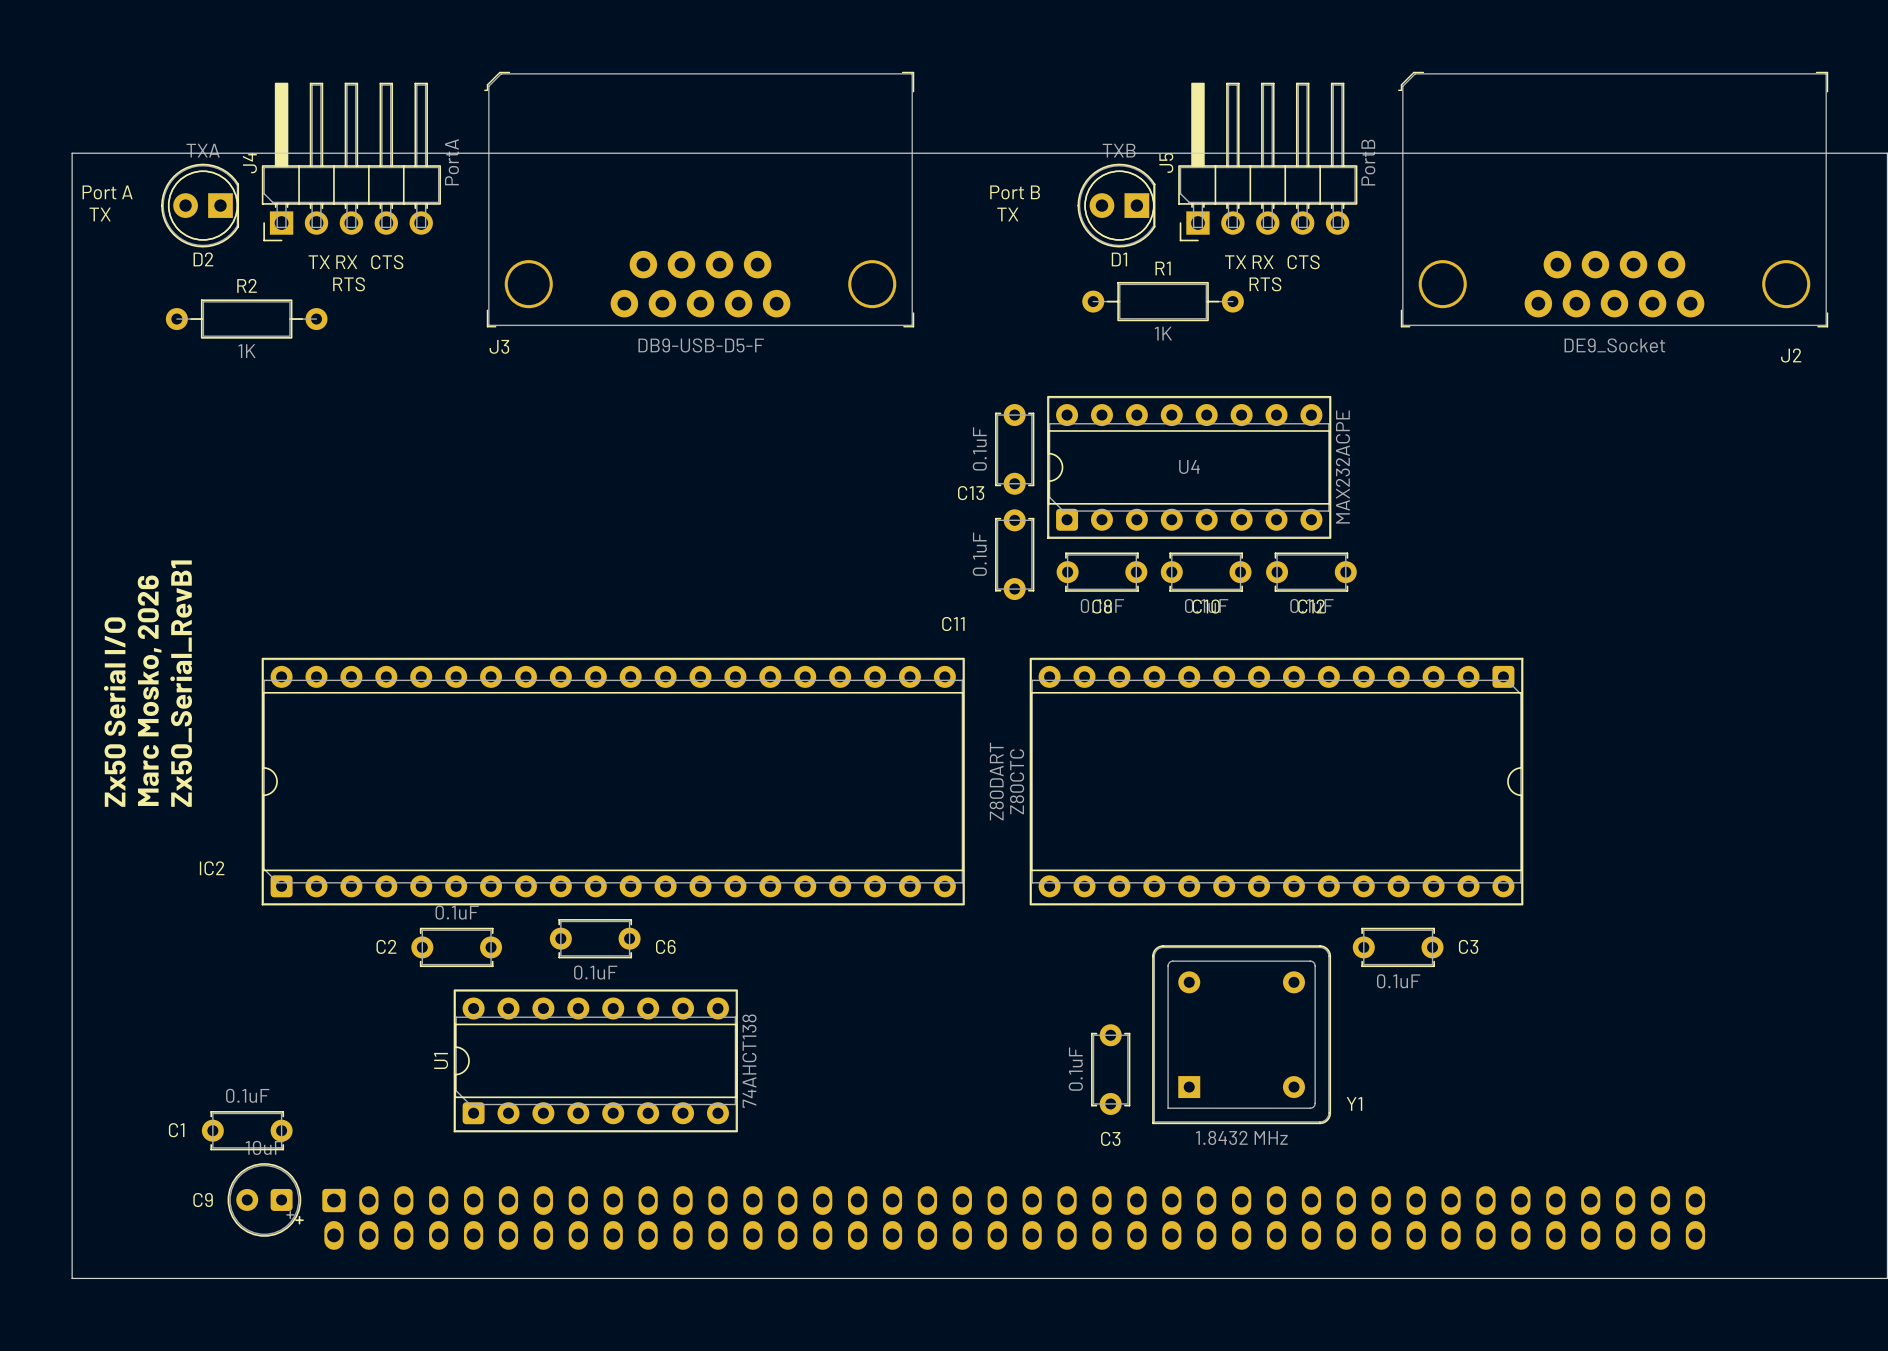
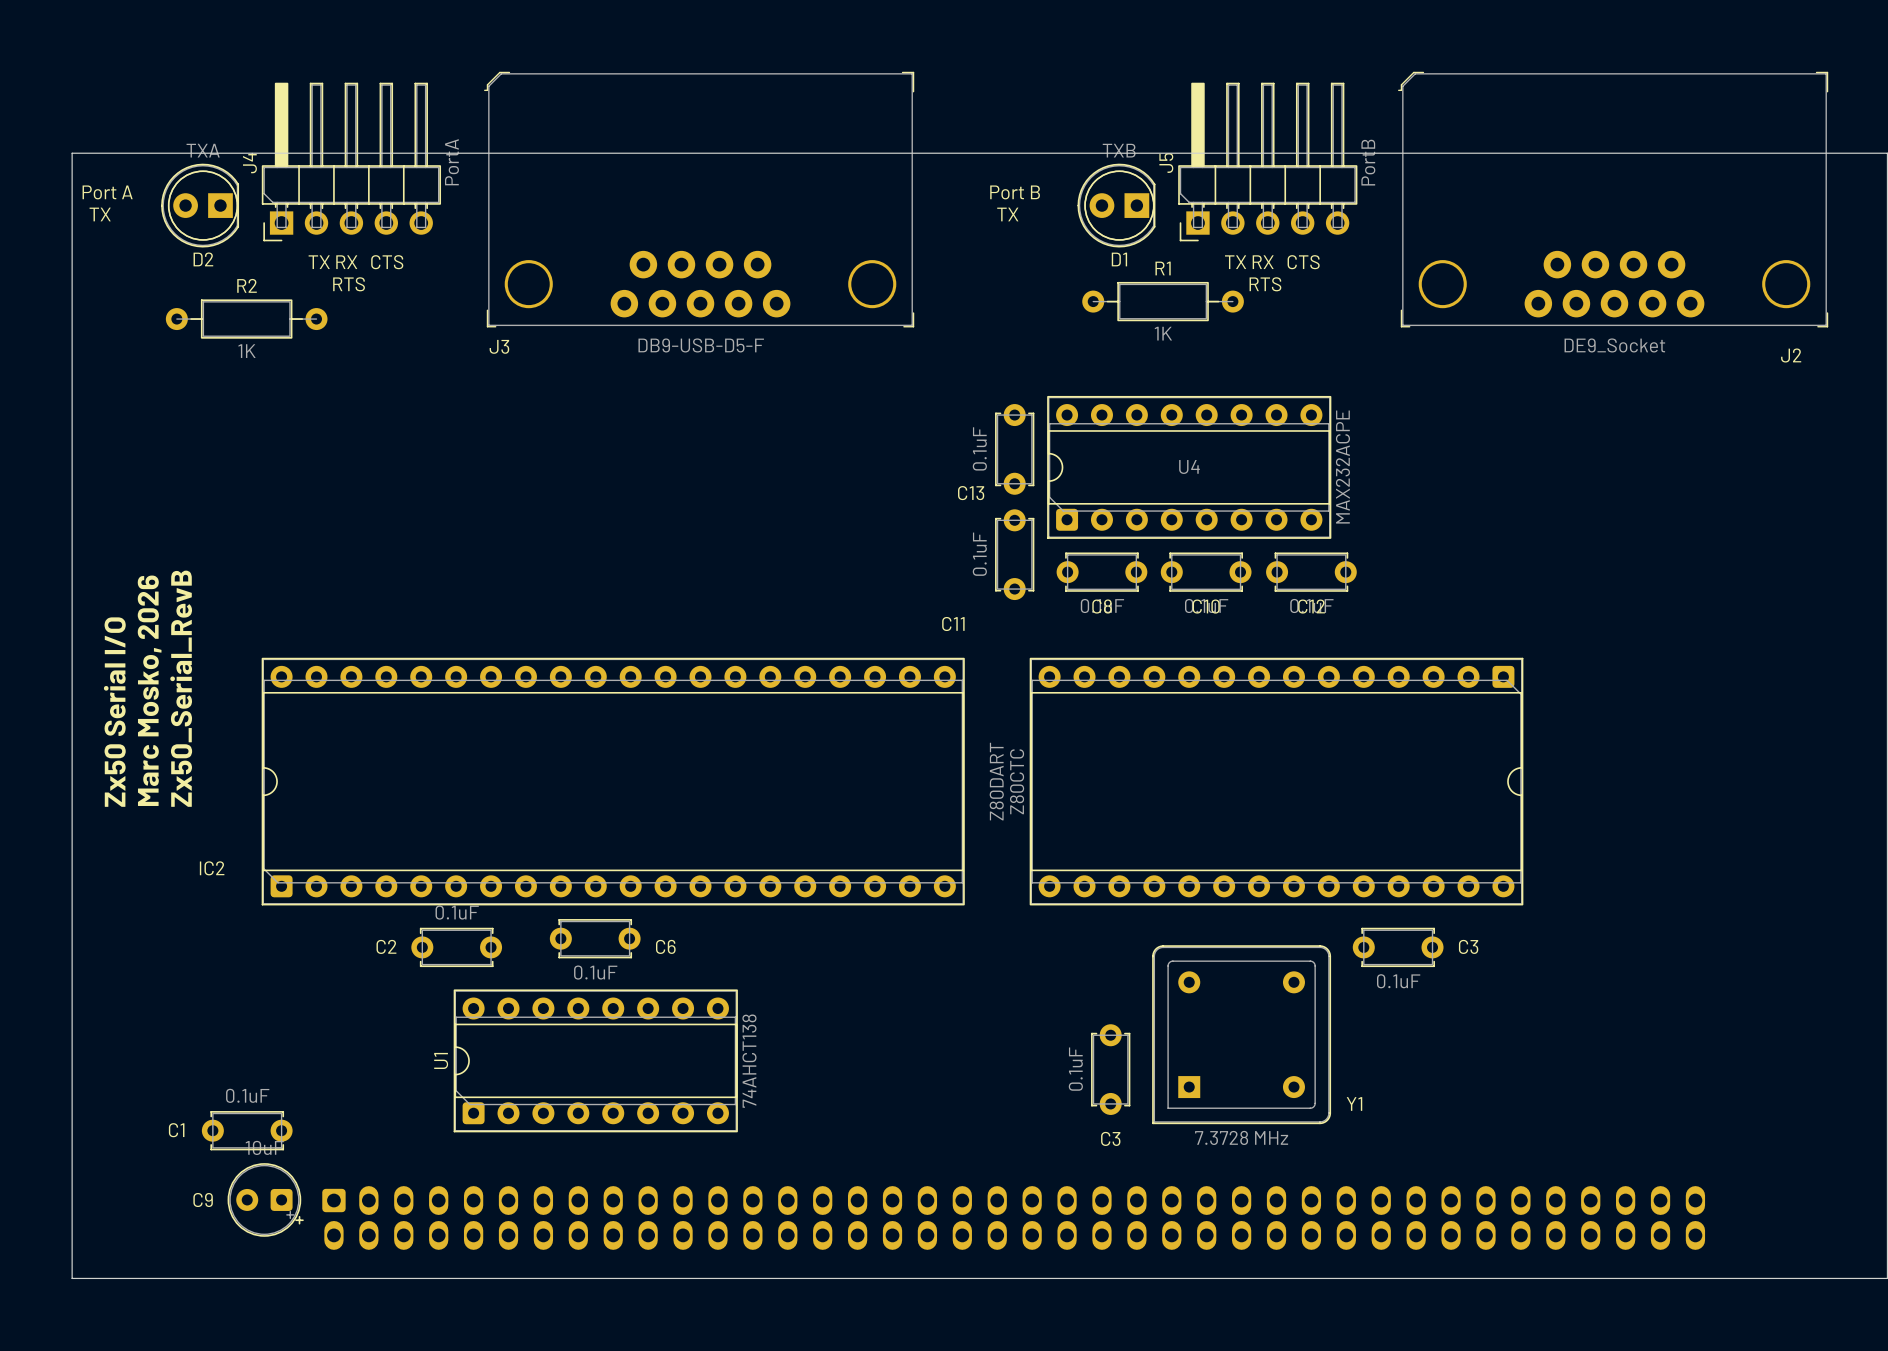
text: Zx50_Serial_RevB1 (181, 683) -> Zx50_Serial_RevB (181, 688)
Y1 value: 1.8432 MHz (1241, 1137) -> 7.3728 MHz (1241, 1137)

